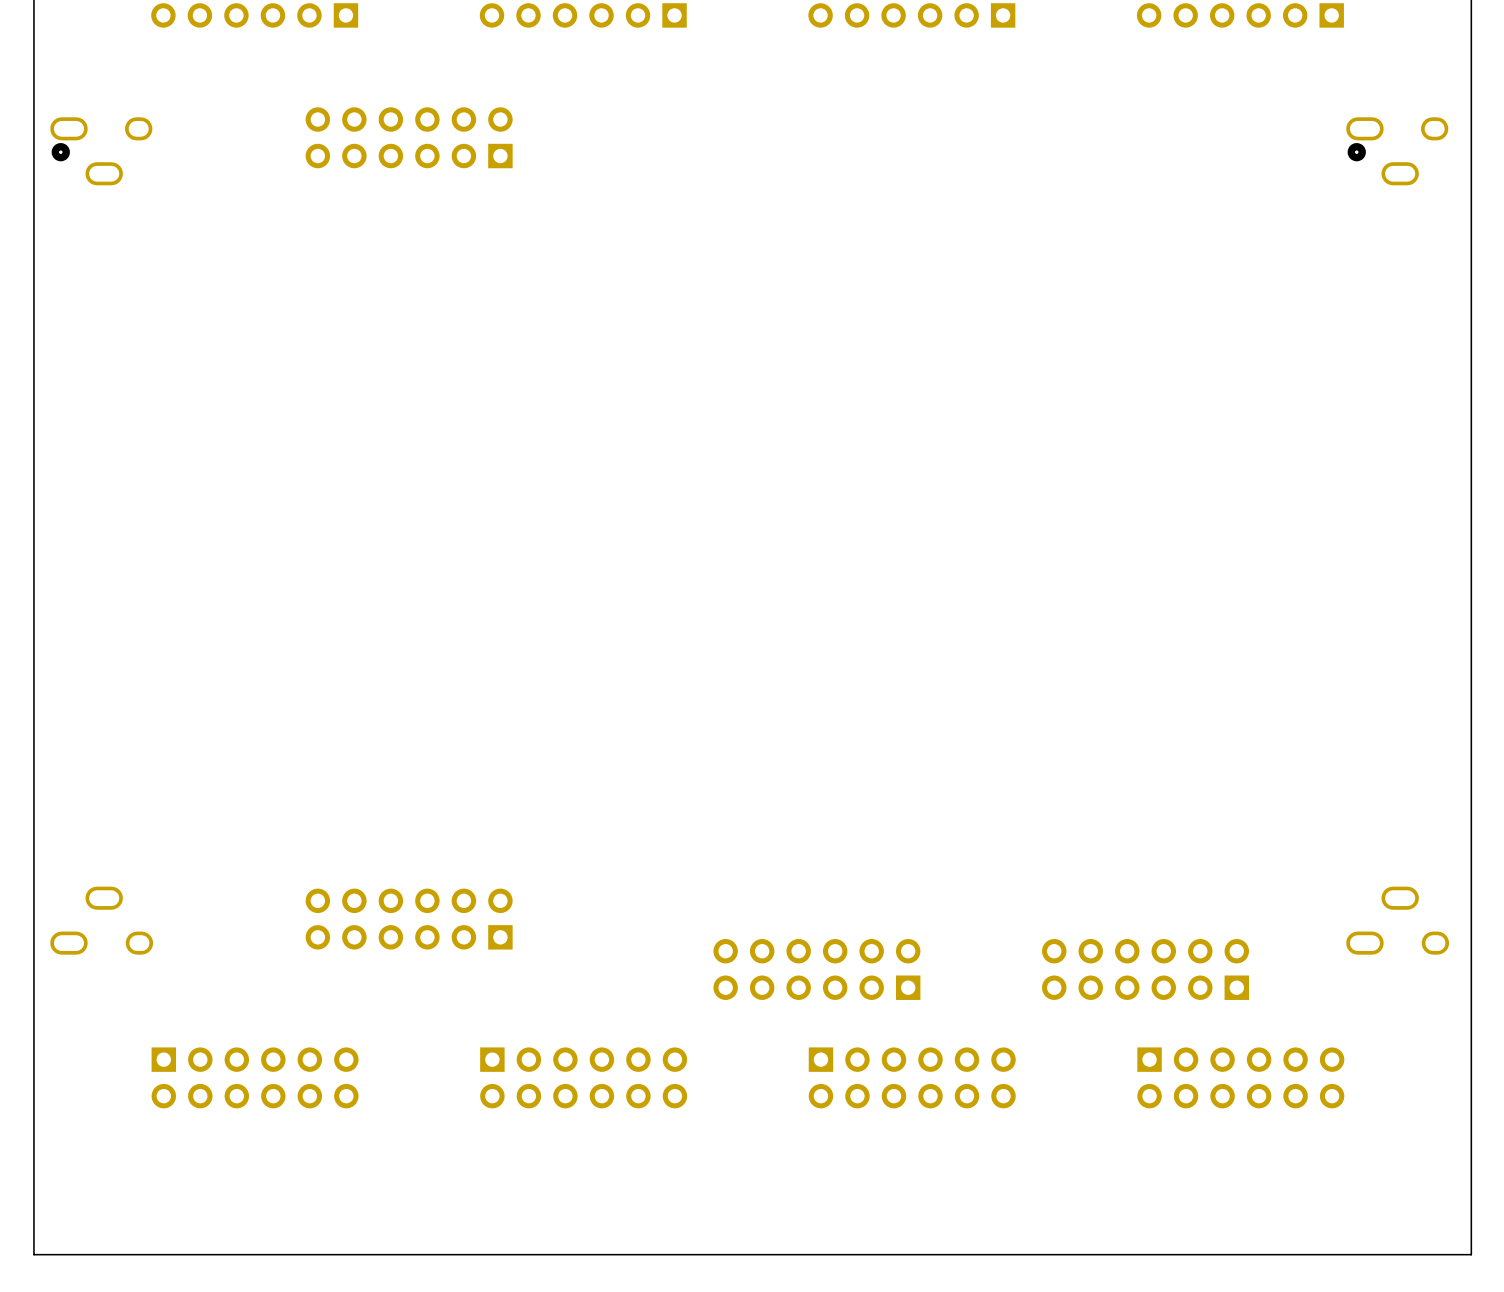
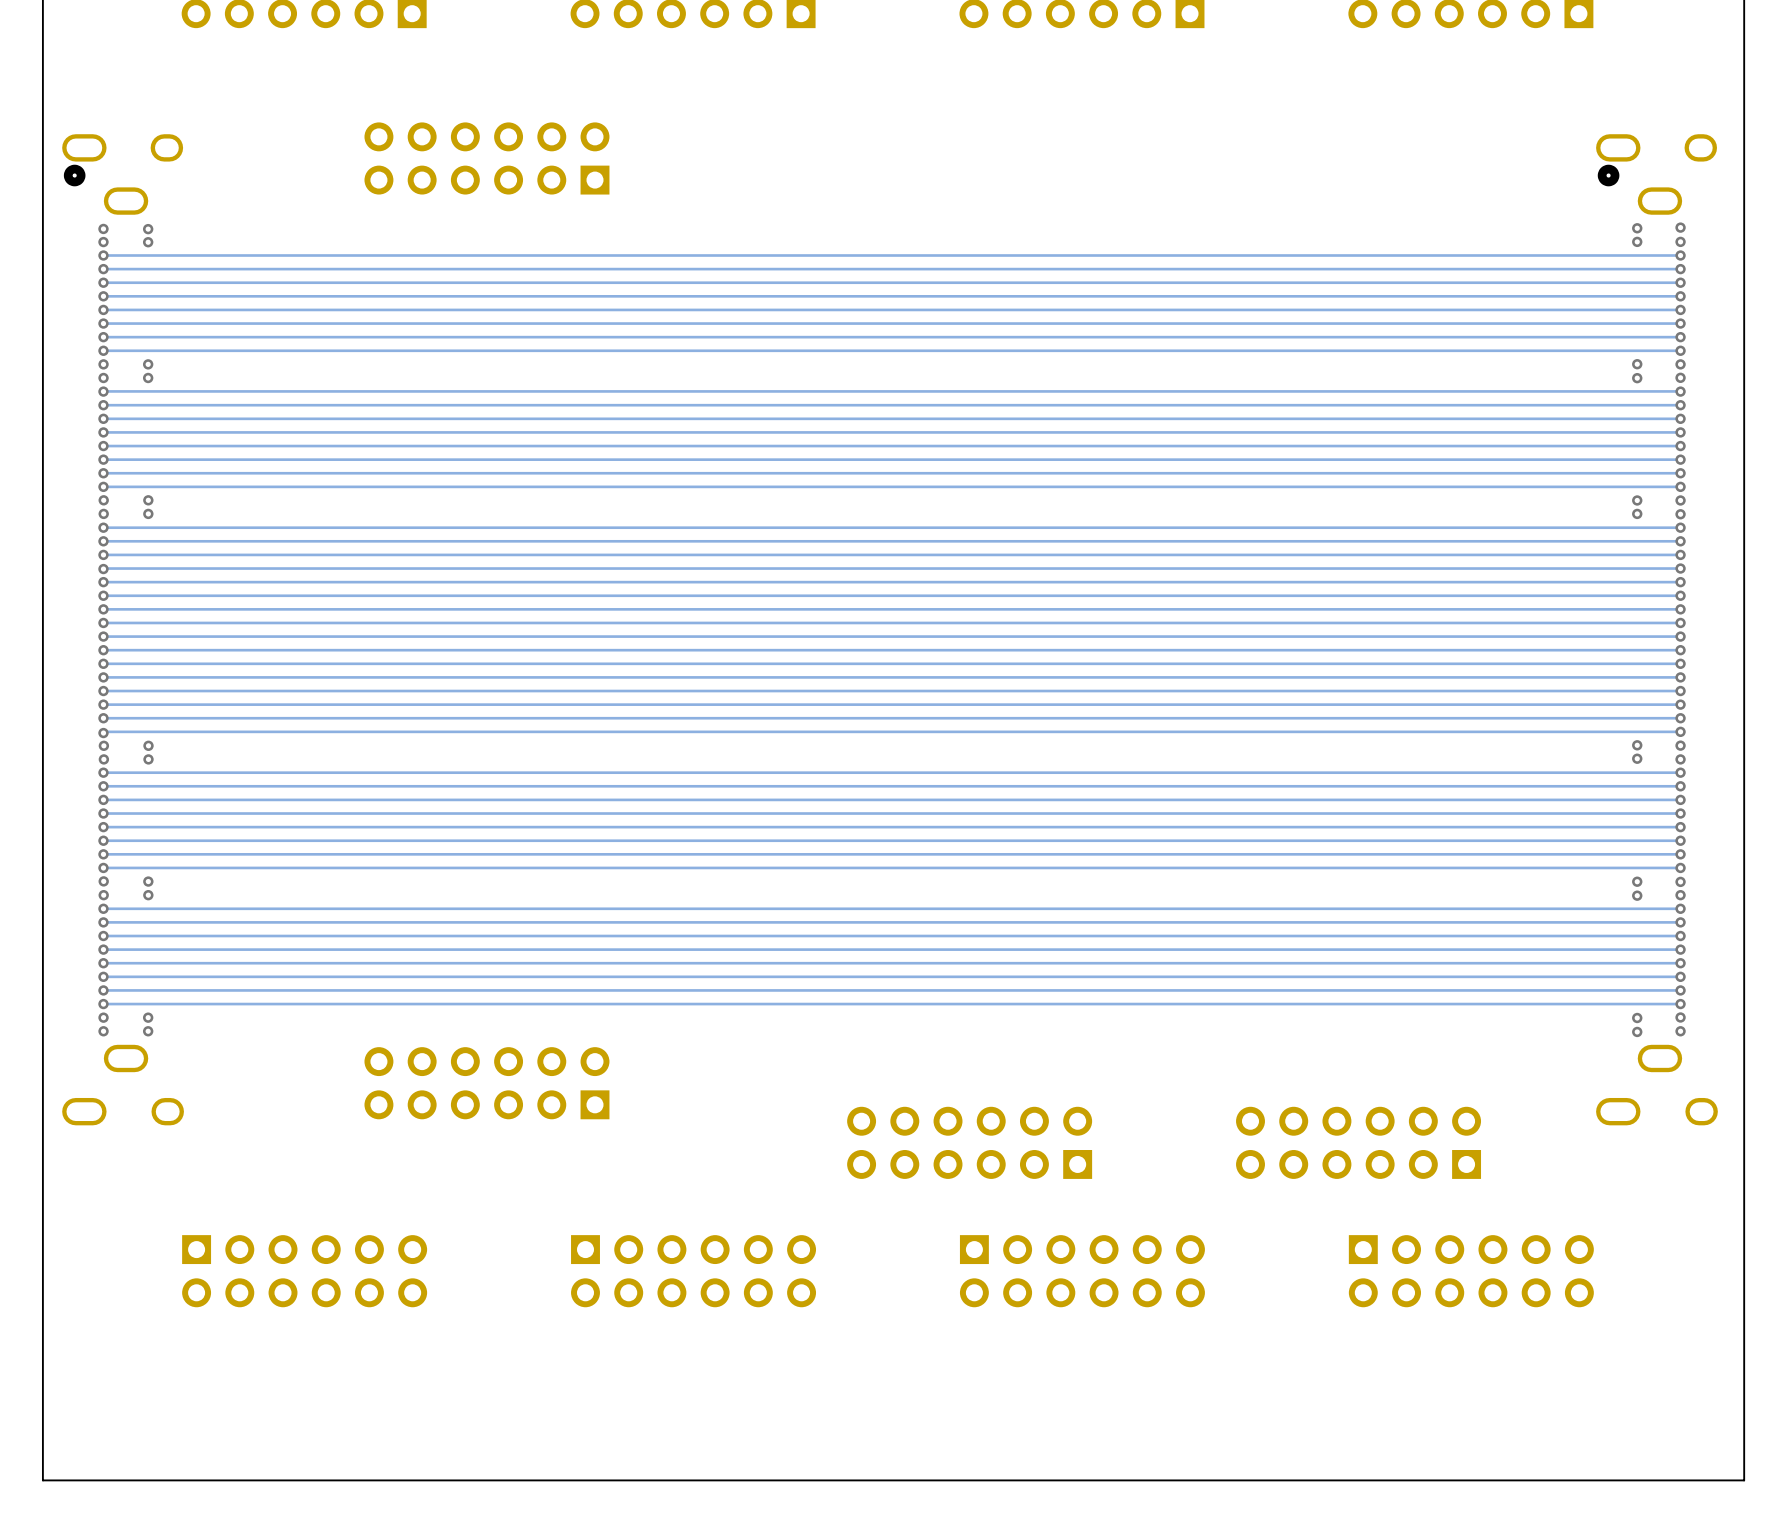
via: none -> (1637, 228)
via: none -> (1680, 227)
via: none -> (103, 228)
via: none -> (148, 229)
via: none -> (103, 242)
via: none -> (148, 242)
via: none -> (1637, 241)
via: none -> (1680, 241)
via: none -> (103, 255)
track: none -> (1680, 255) (103, 255)
via: none -> (1680, 255)
via: none -> (103, 269)
track: none -> (1680, 269) (103, 269)
via: none -> (1680, 269)
via: none -> (103, 282)
track: none -> (1680, 282) (103, 282)
via: none -> (1680, 282)
via: none -> (103, 296)
track: none -> (1680, 296) (103, 296)
via: none -> (1680, 296)
via: none -> (103, 309)
track: none -> (1679, 309) (103, 309)
via: none -> (1680, 309)
via: none -> (103, 323)
track: none -> (1680, 323) (103, 323)
via: none -> (1680, 323)
via: none -> (103, 337)
track: none -> (1679, 337) (103, 337)
via: none -> (1680, 337)
via: none -> (103, 350)
track: none -> (1679, 350) (103, 350)
via: none -> (1680, 350)
via: none -> (103, 364)
via: none -> (148, 364)
via: none -> (1637, 364)
via: none -> (1680, 364)
via: none -> (103, 377)
via: none -> (148, 377)
via: none -> (1637, 378)
via: none -> (1680, 377)
via: none -> (103, 391)
track: none -> (1680, 391) (103, 391)
via: none -> (1680, 391)
via: none -> (103, 405)
track: none -> (1679, 405) (102, 405)
via: none -> (1680, 405)
via: none -> (103, 418)
track: none -> (1679, 418) (102, 418)
via: none -> (1680, 418)
via: none -> (103, 432)
track: none -> (1679, 432) (102, 432)
via: none -> (1680, 432)
via: none -> (103, 446)
track: none -> (1679, 446) (103, 446)
via: none -> (1680, 446)
via: none -> (103, 459)
track: none -> (1679, 459) (102, 459)
via: none -> (1680, 459)
via: none -> (103, 473)
track: none -> (1679, 473) (102, 473)
via: none -> (1680, 473)
via: none -> (103, 486)
track: none -> (1679, 486) (102, 486)
via: none -> (1680, 486)
via: none -> (103, 500)
via: none -> (148, 500)
via: none -> (1637, 500)
via: none -> (1680, 500)
via: none -> (103, 513)
via: none -> (148, 513)
via: none -> (1637, 513)
via: none -> (1680, 514)
via: none -> (103, 527)
track: none -> (1679, 527) (102, 528)
via: none -> (1680, 527)
via: none -> (103, 541)
track: none -> (1679, 541) (102, 541)
via: none -> (1680, 541)
via: none -> (103, 554)
track: none -> (1679, 554) (102, 554)
via: none -> (1680, 554)
via: none -> (103, 569)
track: none -> (1678, 568) (102, 568)
via: none -> (1680, 568)
via: none -> (103, 582)
track: none -> (1679, 582) (103, 582)
via: none -> (1680, 582)
via: none -> (103, 595)
track: none -> (1678, 595) (102, 595)
via: none -> (1680, 595)
via: none -> (103, 609)
track: none -> (1678, 609) (102, 609)
via: none -> (1680, 609)
via: none -> (103, 622)
track: none -> (1678, 622) (102, 622)
via: none -> (1680, 622)
via: none -> (103, 636)
track: none -> (1678, 636) (102, 636)
via: none -> (1680, 636)
via: none -> (103, 650)
track: none -> (1677, 650) (102, 650)
via: none -> (1680, 650)
via: none -> (103, 663)
track: none -> (1677, 663) (102, 663)
via: none -> (1680, 663)
via: none -> (103, 677)
track: none -> (1677, 677) (102, 677)
via: none -> (1680, 677)
via: none -> (103, 691)
track: none -> (1678, 691) (102, 691)
via: none -> (1680, 691)
via: none -> (103, 704)
track: none -> (1677, 704) (102, 704)
via: none -> (1680, 704)
via: none -> (103, 718)
track: none -> (1678, 718) (103, 718)
via: none -> (1680, 718)
track: none -> (1678, 731) (102, 731)
via: none -> (1680, 731)
via: none -> (103, 733)
via: none -> (1637, 745)
via: none -> (1680, 745)
via: none -> (103, 745)
via: none -> (148, 745)
via: none -> (1637, 758)
via: none -> (103, 759)
via: none -> (148, 759)
via: none -> (1680, 759)
via: none -> (103, 772)
track: none -> (1678, 772) (104, 772)
via: none -> (1680, 772)
via: none -> (103, 786)
track: none -> (1677, 786) (103, 786)
via: none -> (1680, 786)
via: none -> (103, 799)
track: none -> (1677, 799) (105, 799)
via: none -> (1680, 799)
track: none -> (104, 813) (1677, 814)
via: none -> (103, 813)
via: none -> (1680, 813)
via: none -> (103, 827)
track: none -> (1677, 827) (104, 827)
via: none -> (1680, 827)
via: none -> (103, 840)
track: none -> (1676, 840) (104, 840)
via: none -> (1680, 840)
via: none -> (103, 854)
track: none -> (1677, 854) (104, 854)
via: none -> (1680, 854)
via: none -> (103, 867)
track: none -> (1676, 867) (104, 867)
via: none -> (1680, 867)
via: none -> (103, 881)
via: none -> (148, 881)
via: none -> (1637, 881)
via: none -> (1680, 881)
via: none -> (103, 895)
via: none -> (148, 895)
via: none -> (1637, 895)
via: none -> (1680, 895)
via: none -> (103, 908)
track: none -> (1677, 908) (104, 908)
via: none -> (1680, 908)
via: none -> (103, 922)
track: none -> (1676, 922) (104, 922)
via: none -> (1680, 922)
via: none -> (103, 936)
track: none -> (1677, 936) (104, 936)
via: none -> (1680, 936)
via: none -> (103, 949)
track: none -> (1676, 949) (104, 949)
via: none -> (1680, 949)
via: none -> (103, 963)
track: none -> (1676, 963) (105, 963)
via: none -> (1680, 963)
via: none -> (103, 976)
track: none -> (1676, 976) (104, 976)
via: none -> (1680, 976)
via: none -> (103, 990)
track: none -> (1676, 990) (105, 990)
via: none -> (1680, 990)
via: none -> (103, 1004)
track: none -> (1675, 1004) (105, 1004)
via: none -> (1680, 1004)
via: none -> (103, 1017)
via: none -> (148, 1017)
via: none -> (1637, 1018)
via: none -> (1680, 1017)
via: none -> (103, 1031)
via: none -> (148, 1031)
via: none -> (1637, 1031)
via: none -> (1680, 1031)

